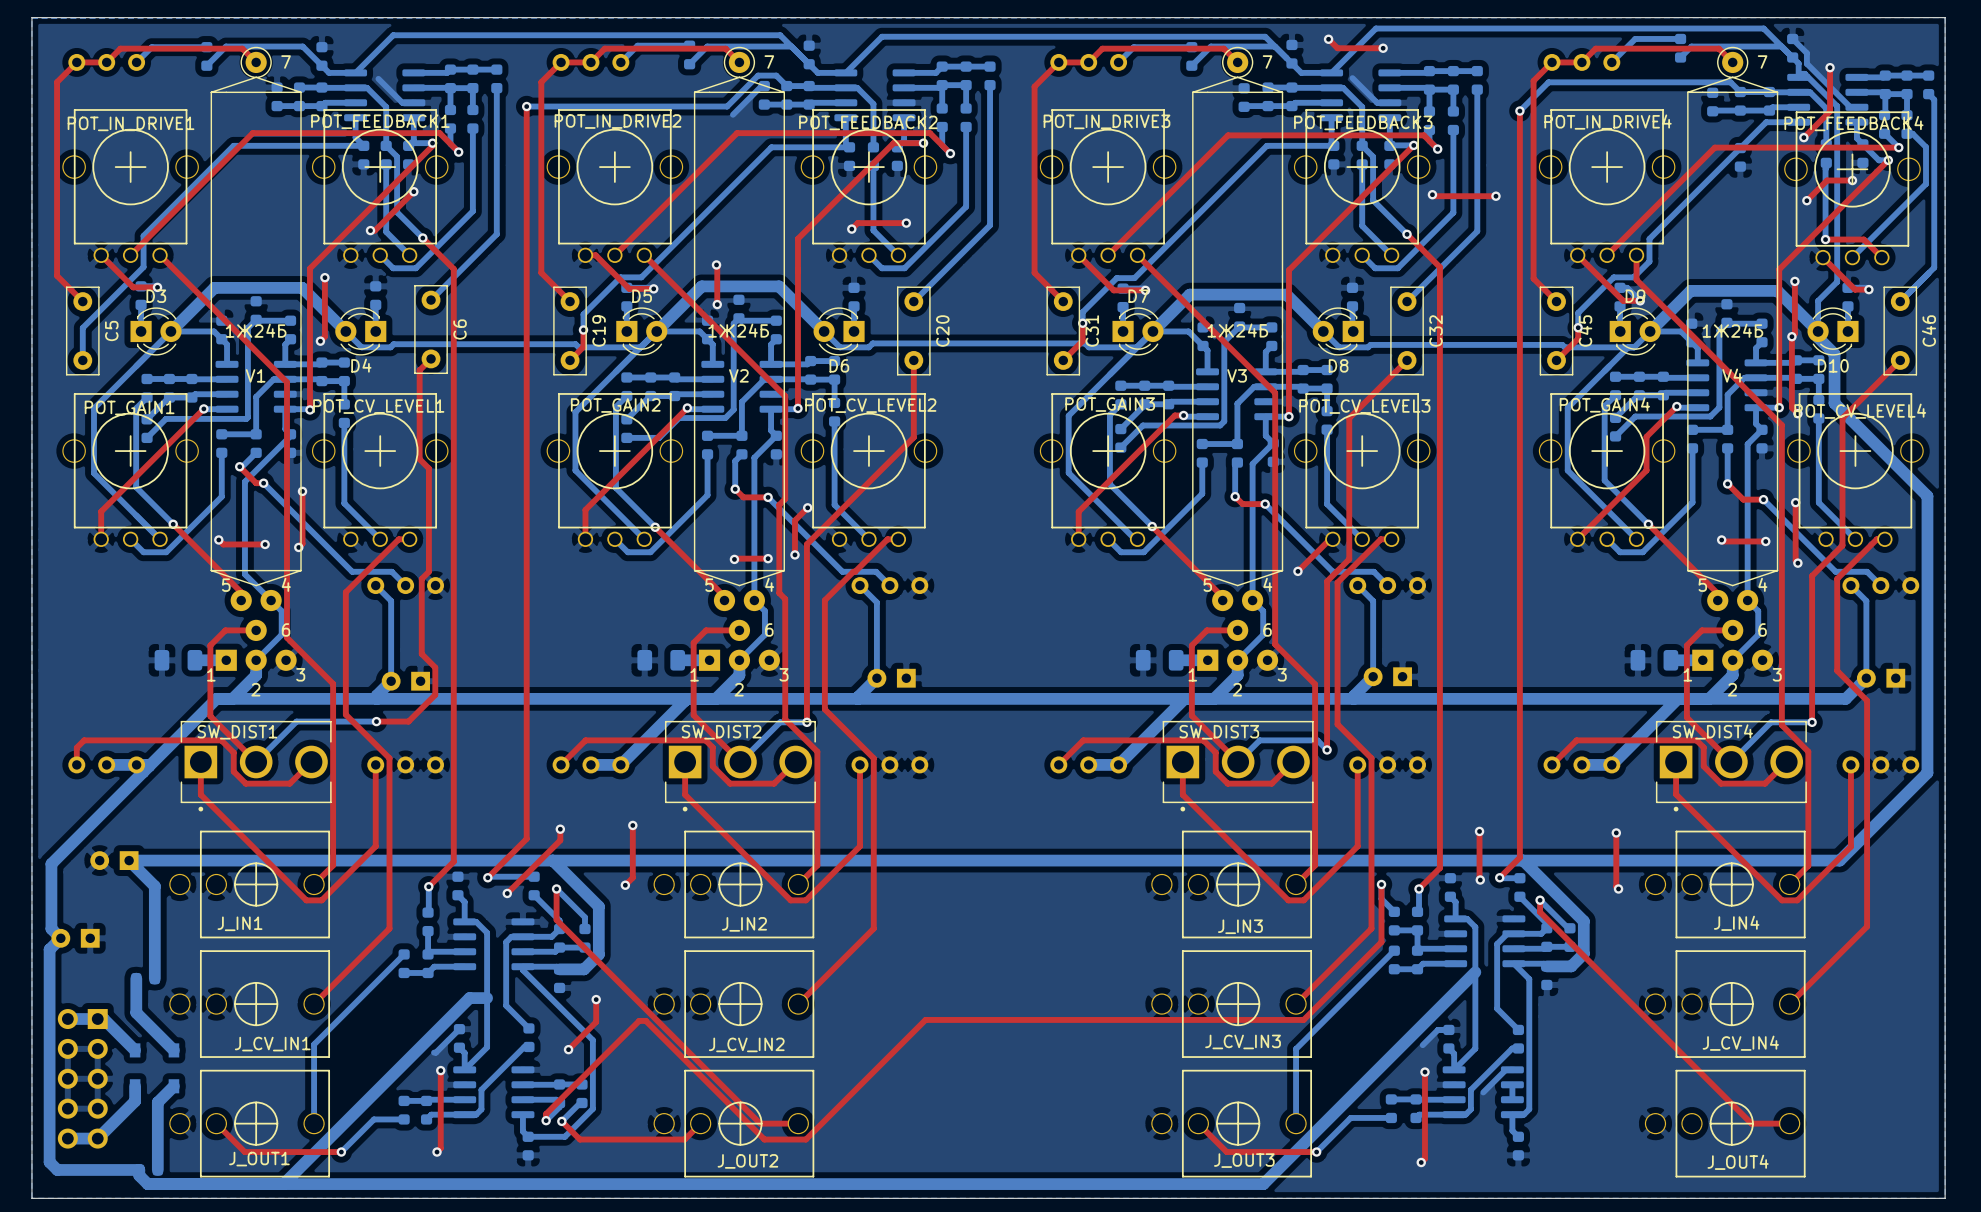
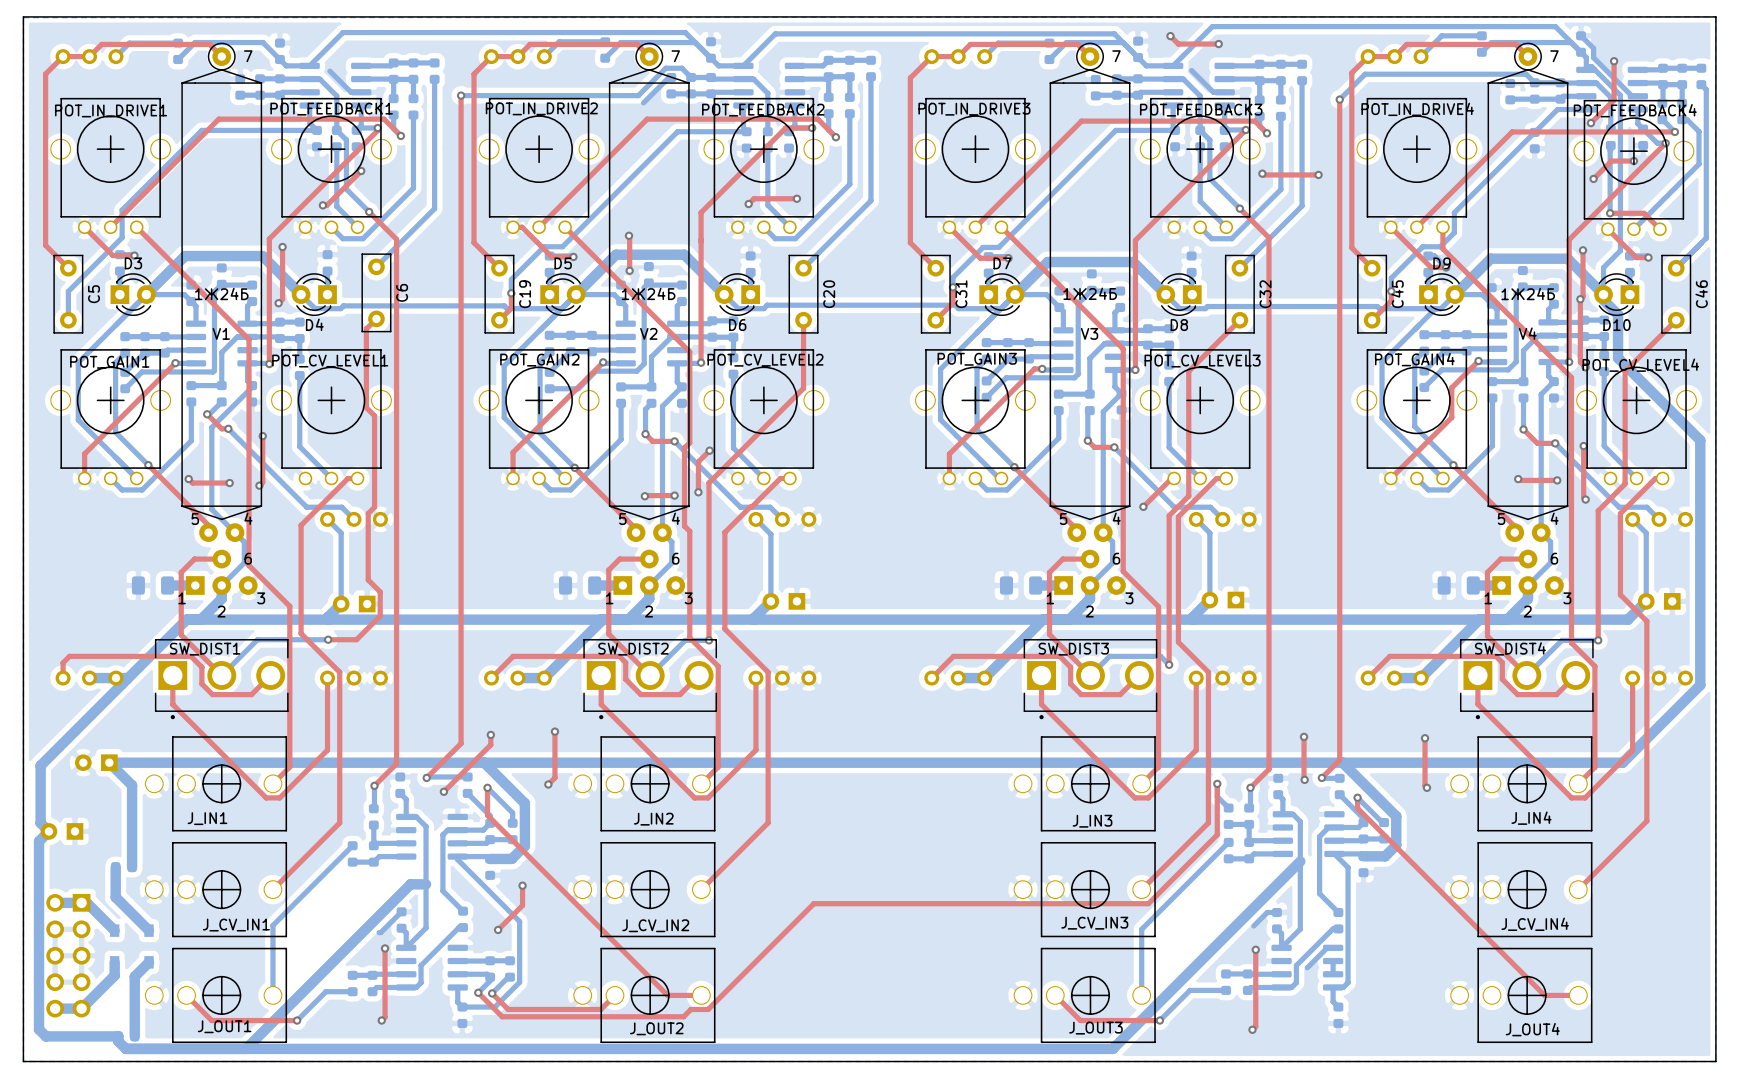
top track: (546, 1120) (546, 1113) (639, 1020) (645, 1020) (764, 1139) (786, 1139) -> (478, 992) (502, 1016) (683, 1016) (690, 1009)

